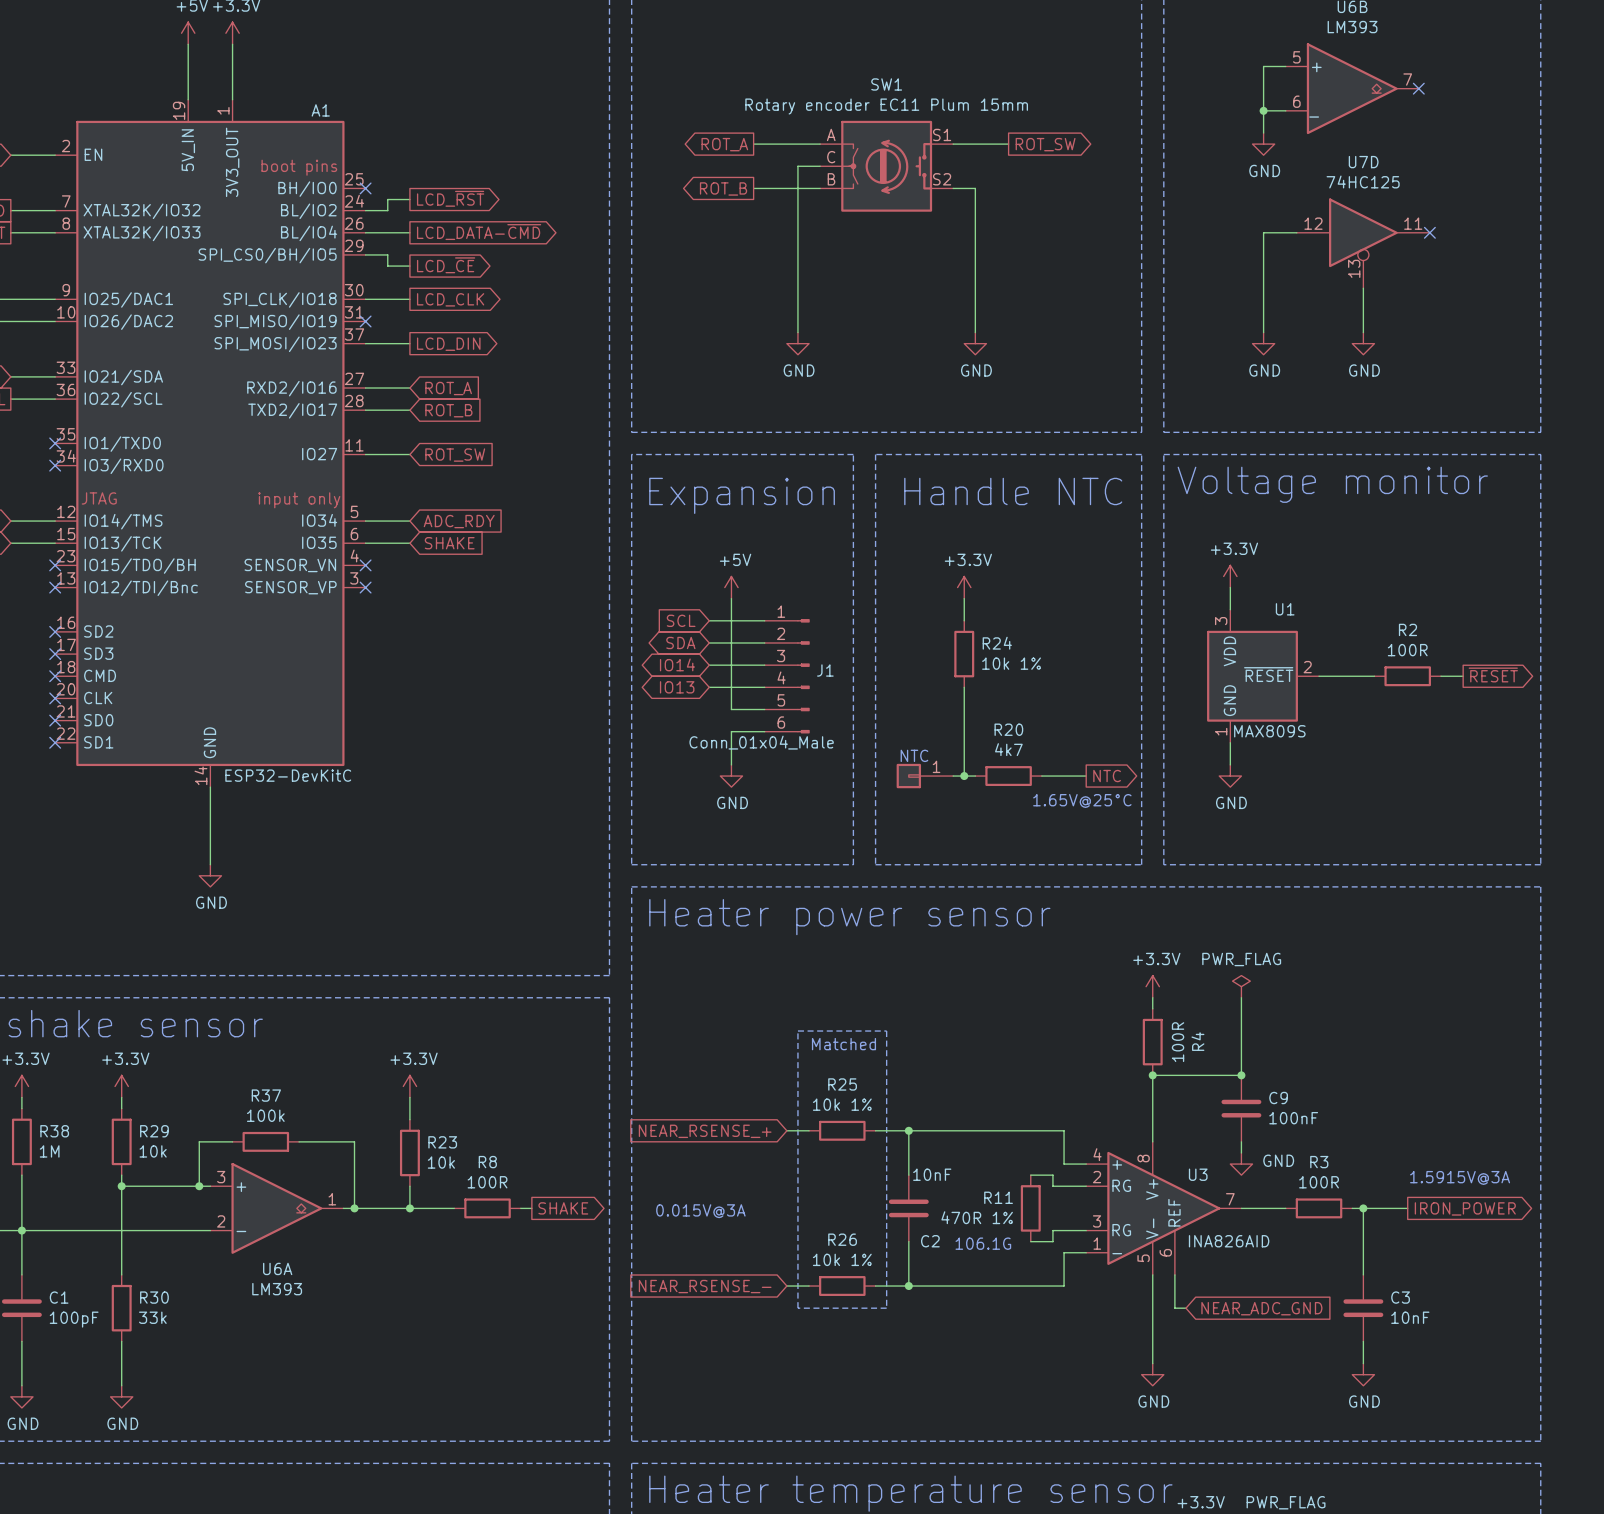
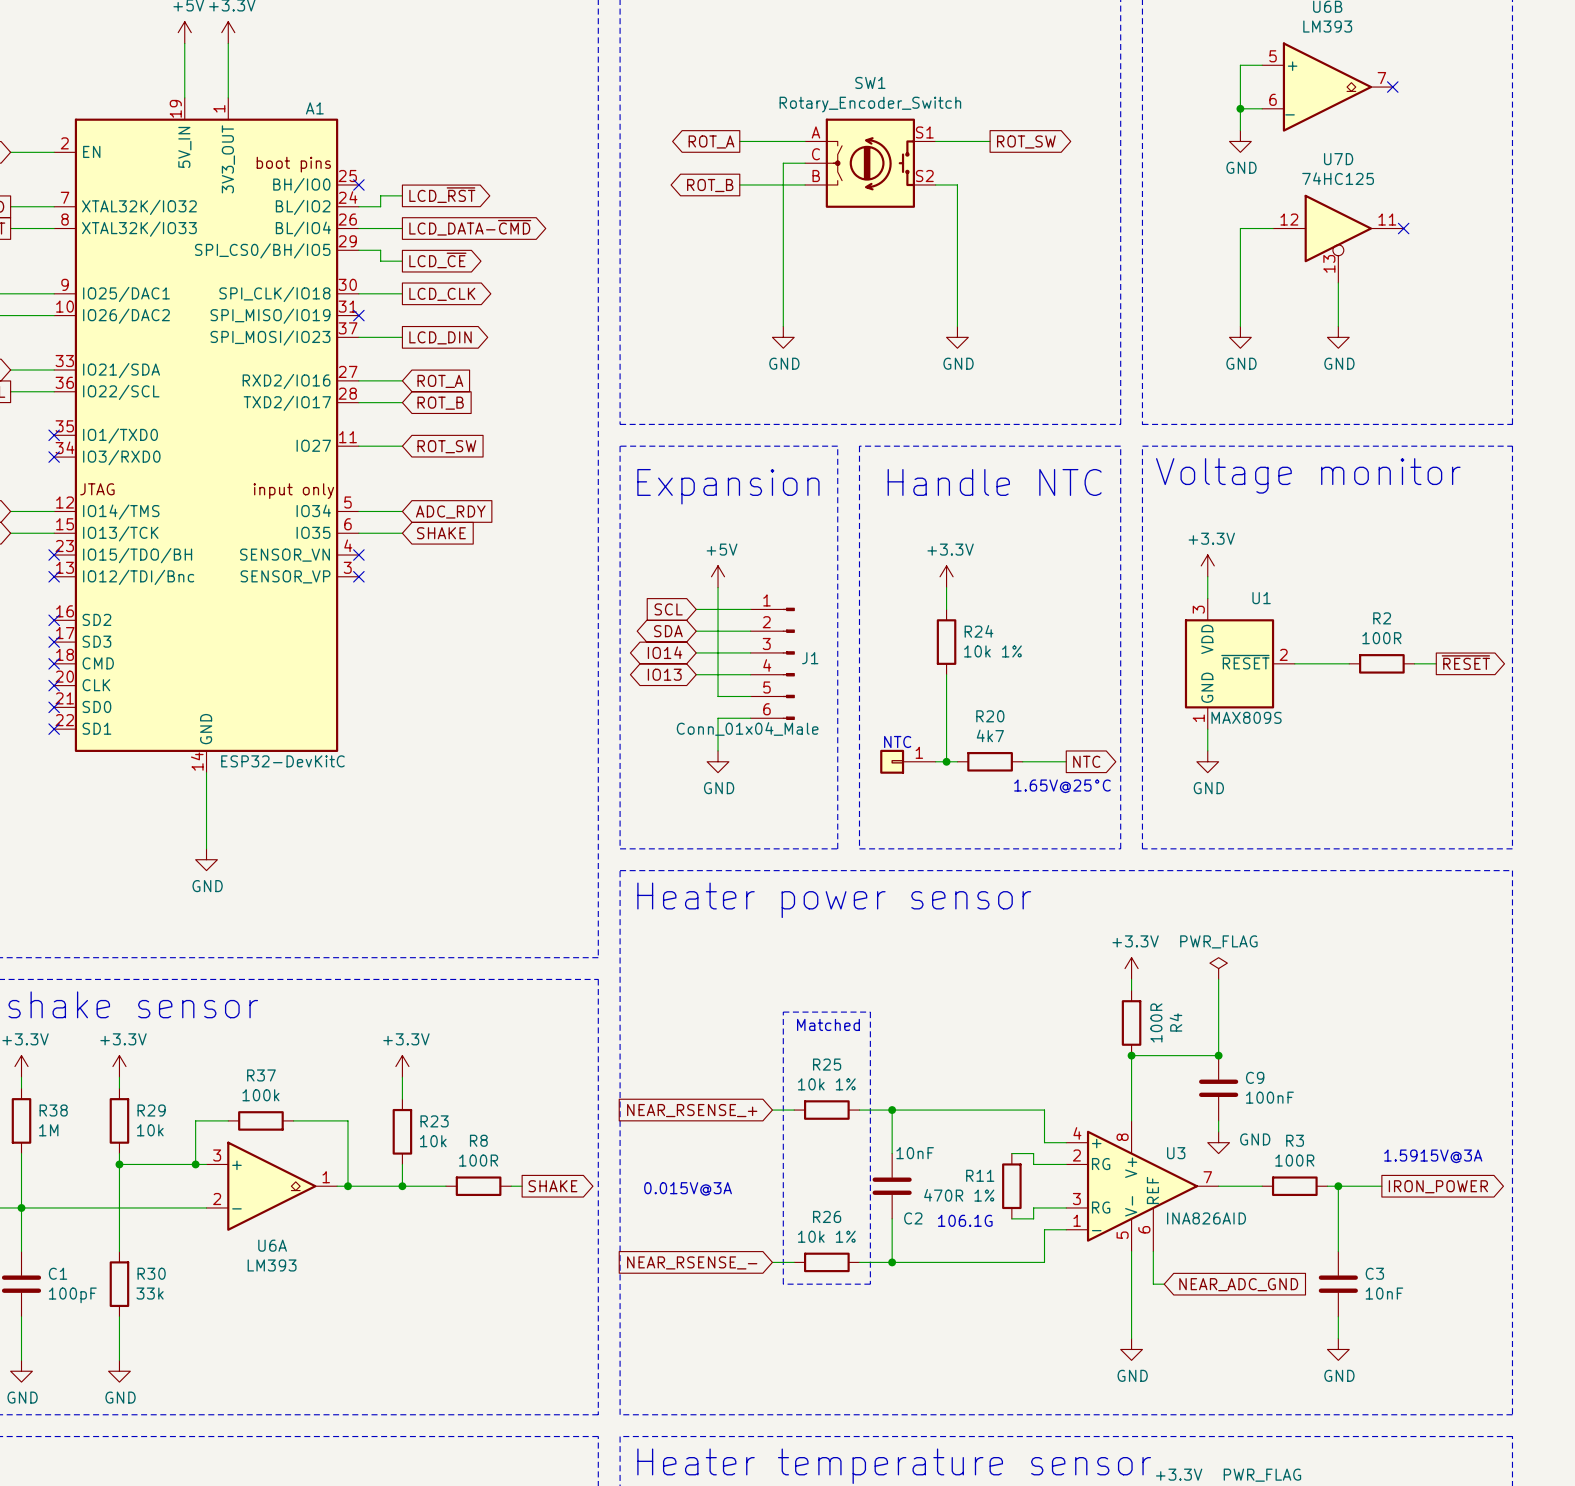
SW1 value: Rotary encoder EC11 Plum 15mm (886, 106) -> Rotary_Encoder_Switch (870, 104)

